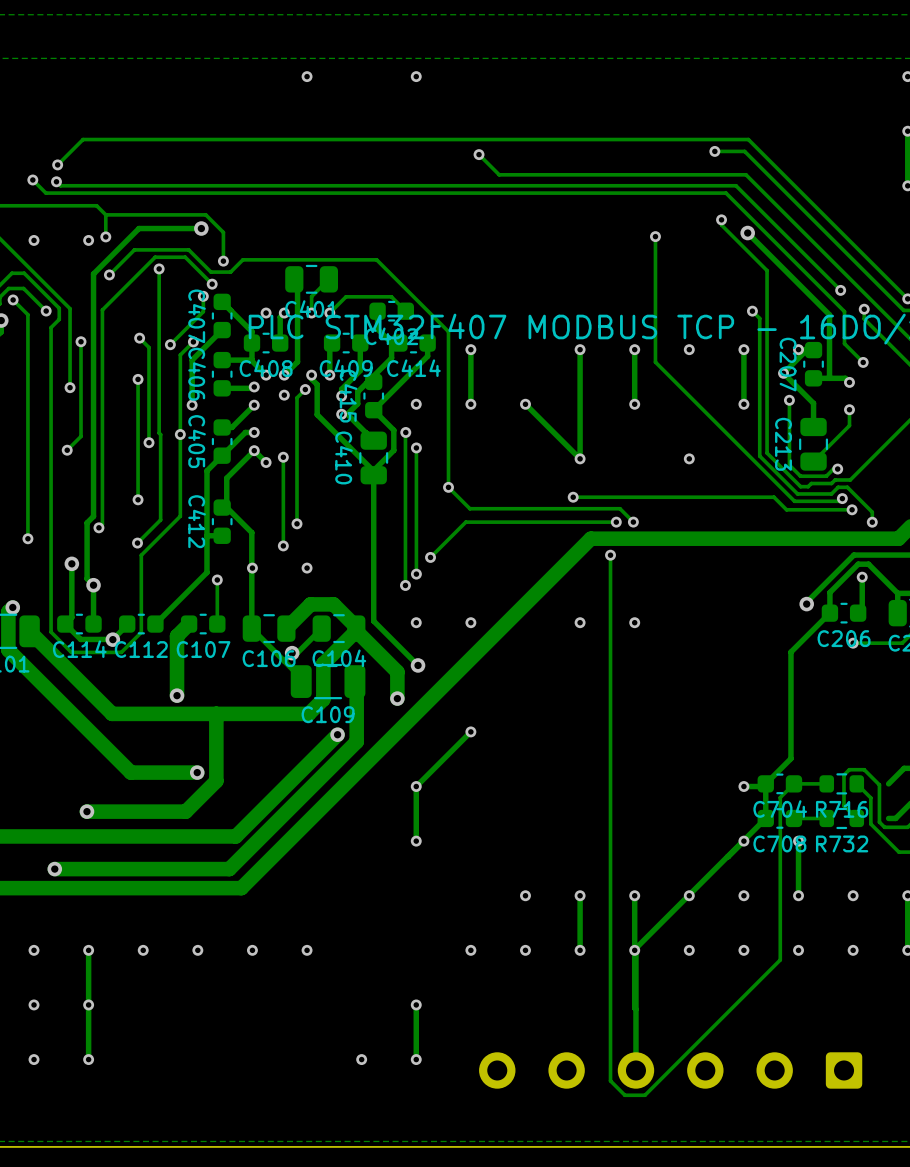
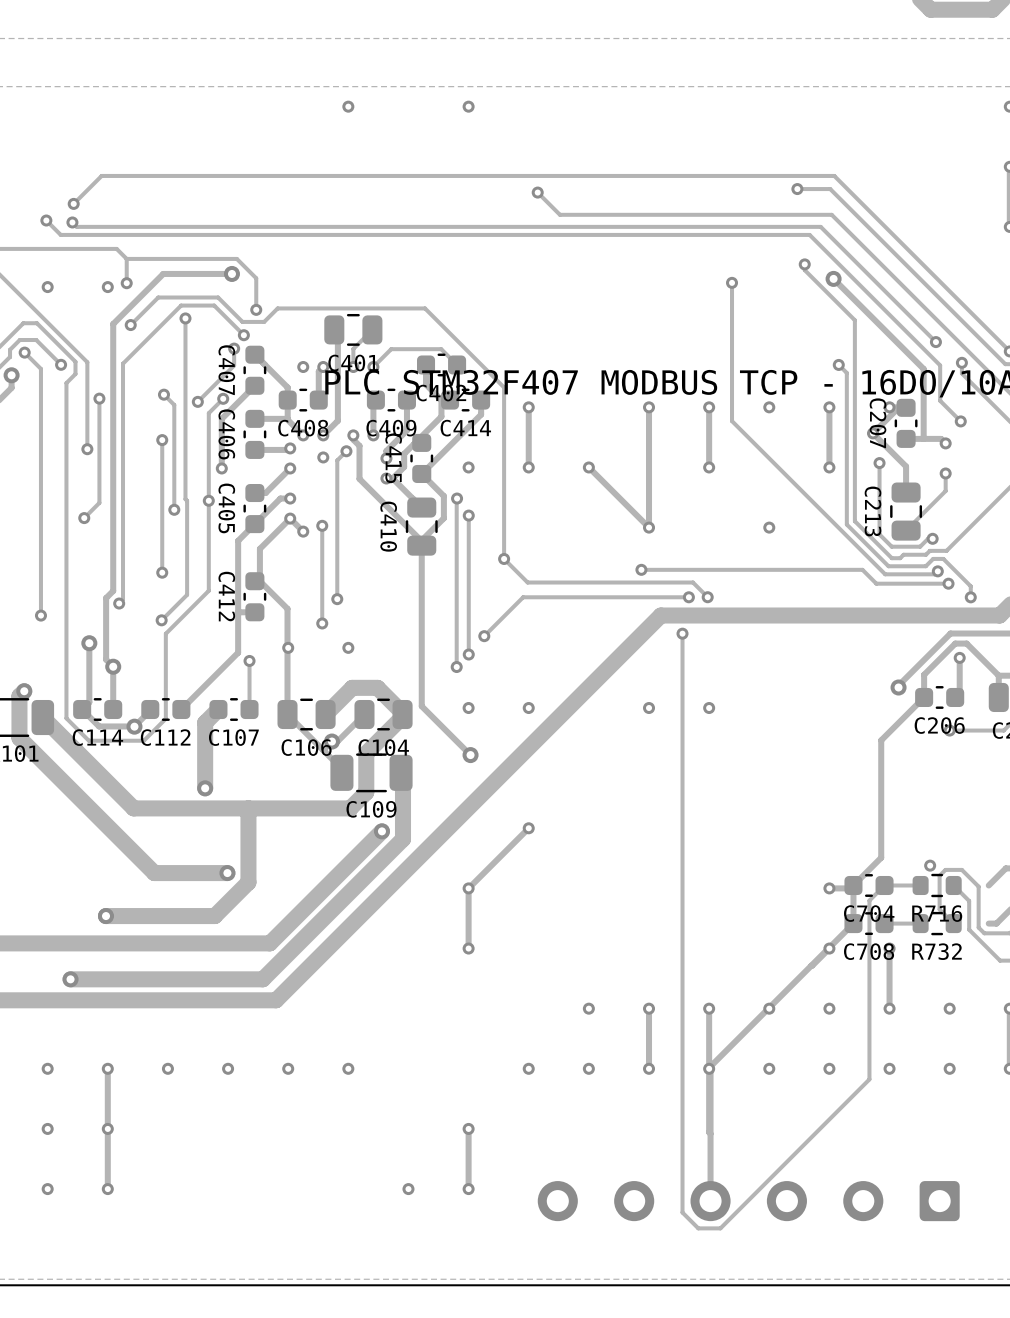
track: (356, 630) (397, 671) (397, 698) -> none
via: (397, 698) -> none
via: none -> (930, 865)

